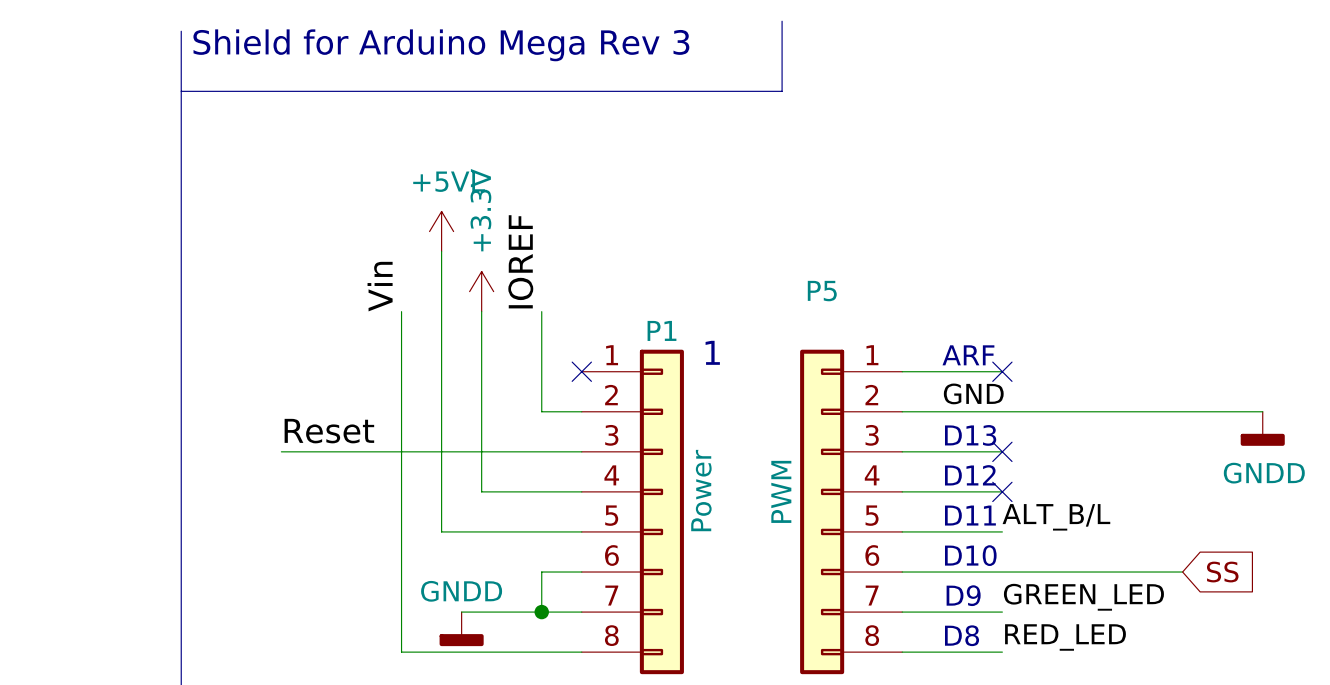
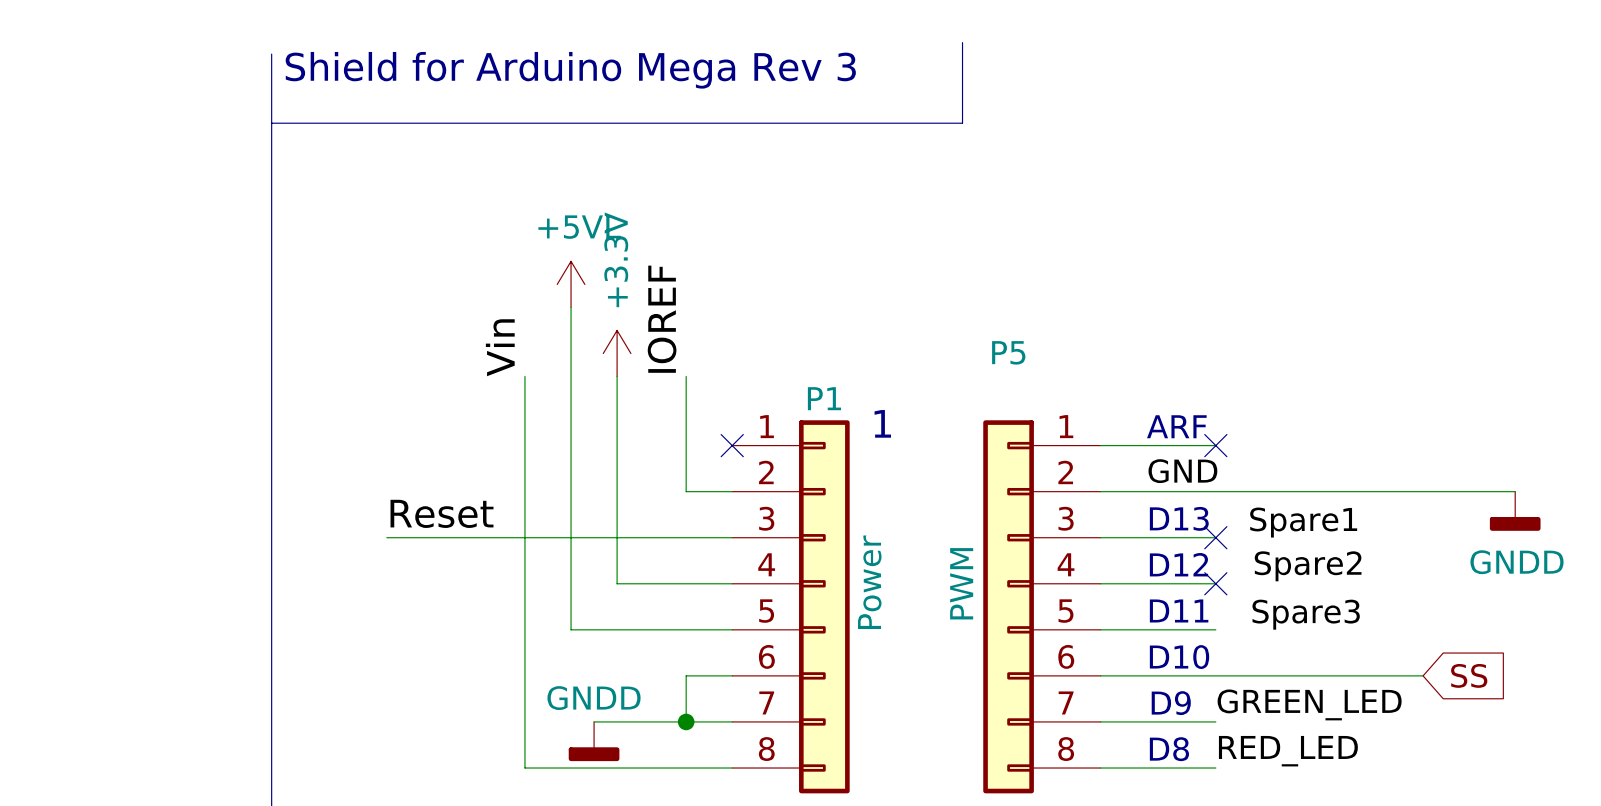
label: none -> Spare1 (1303, 522)
label: none -> Spare2 (1308, 566)
label: ALT_B/L (1056, 517) -> none
label: none -> Spare3 (1306, 614)

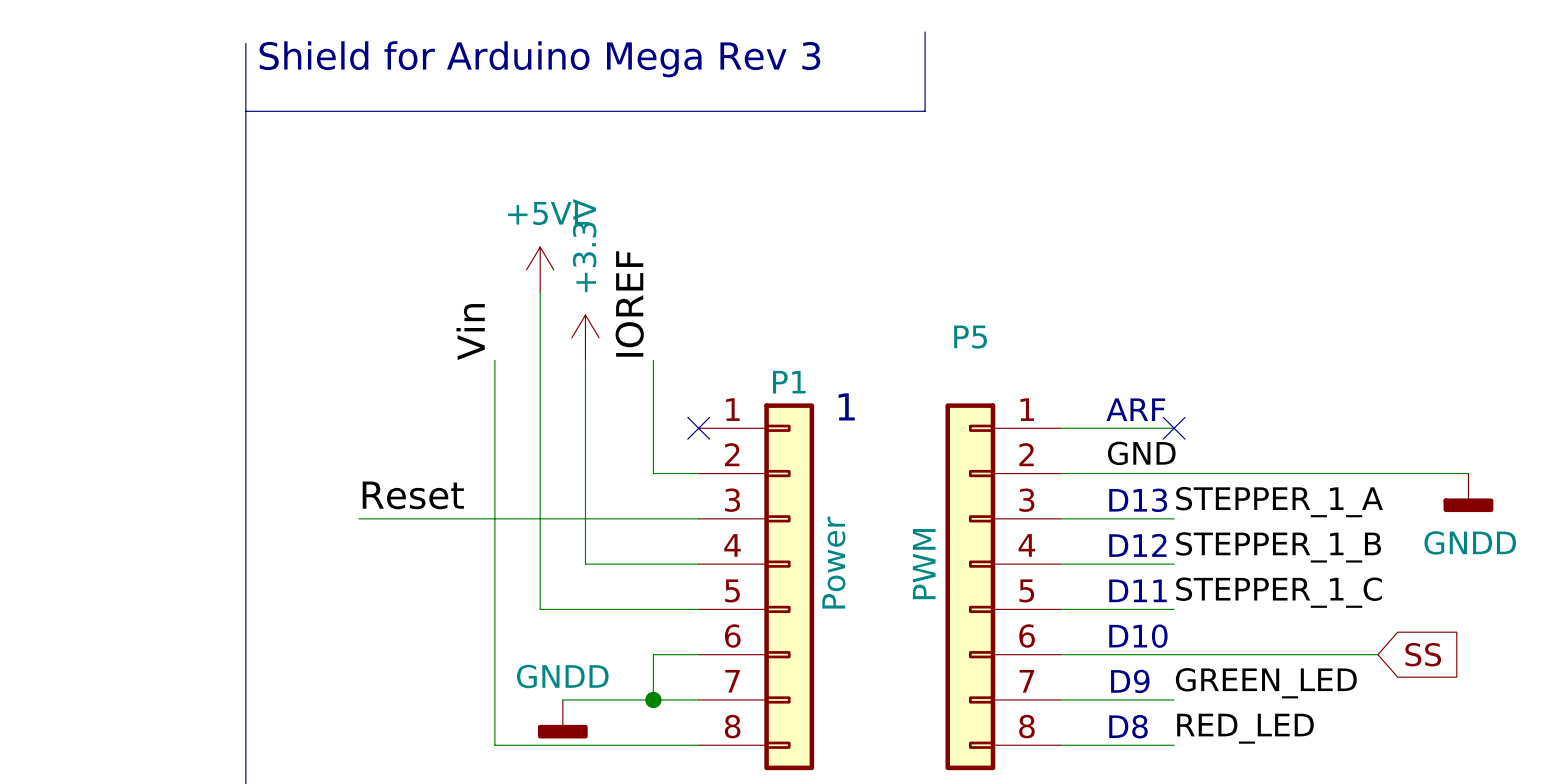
label: none -> STEPPER_1_A (1279, 502)
label: Spare1 (1303, 522) -> none
no-connect mark: (1215, 537) -> none
label: Spare2 (1308, 566) -> none
label: none -> STEPPER_1_B (1278, 547)
no-connect mark: (1215, 583) -> none
label: none -> STEPPER_1_C (1279, 592)
label: Spare3 (1306, 614) -> none

